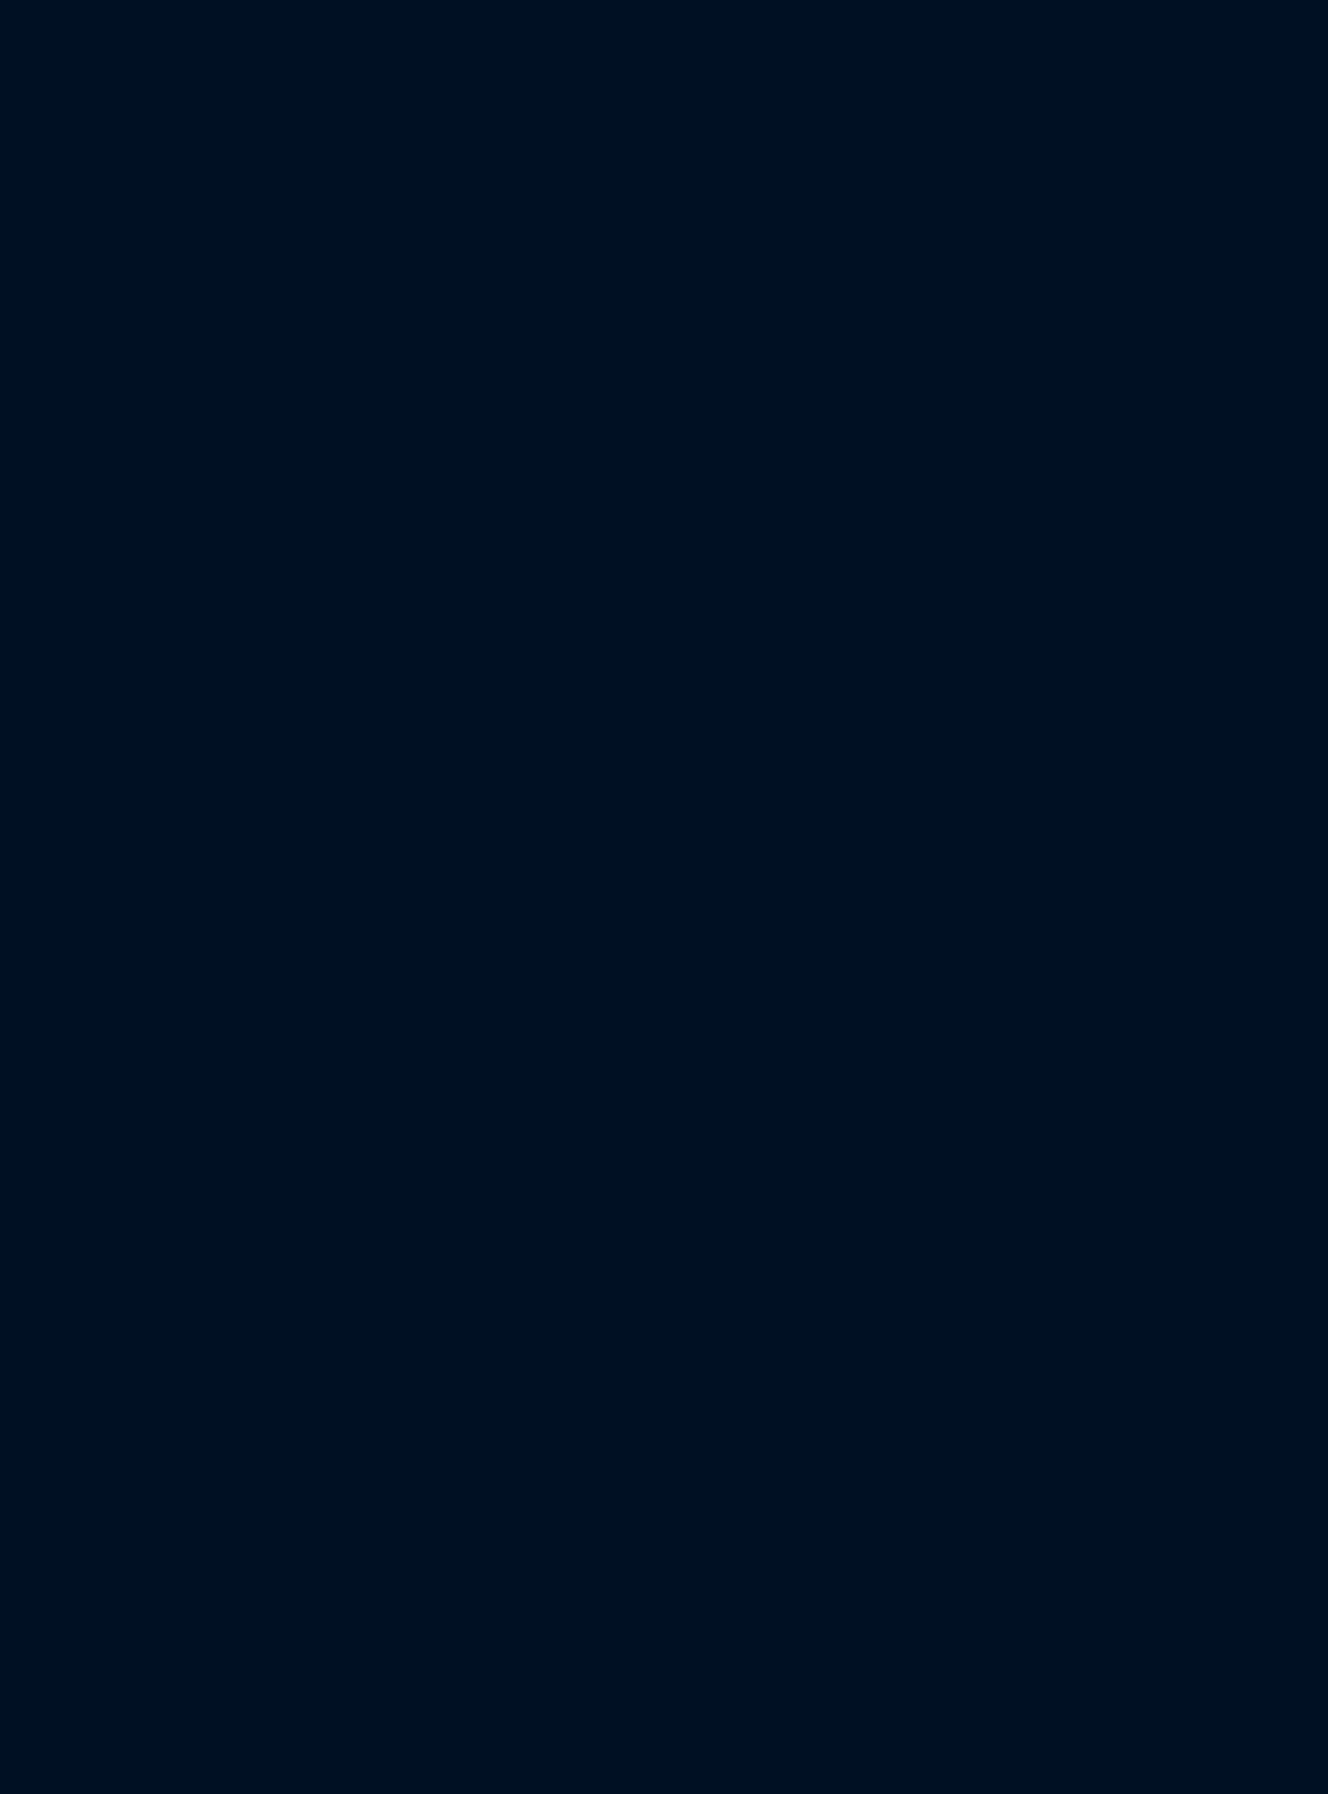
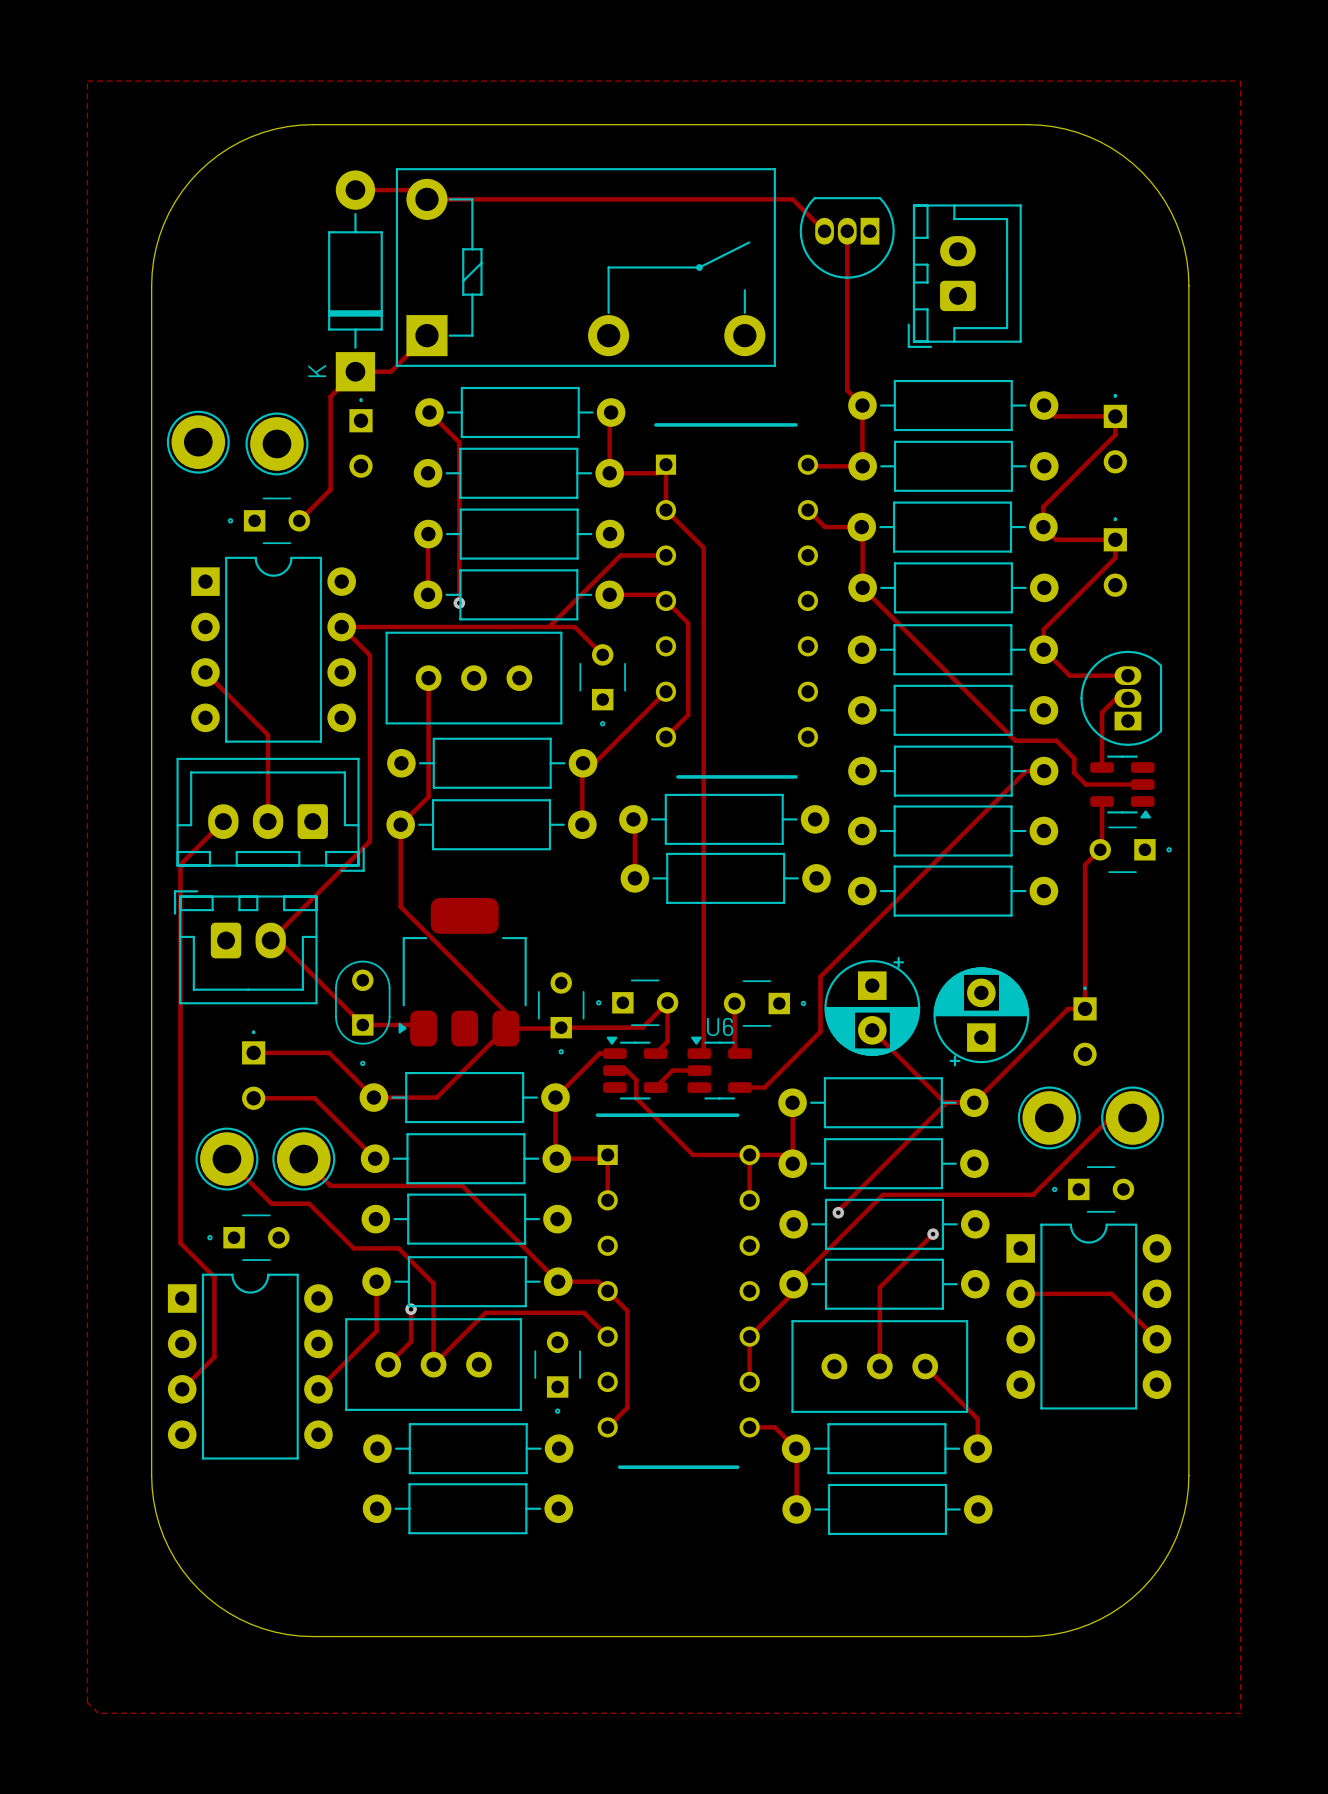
zone outline: none -> (87, 81) (87, 1702) (98, 1713) (1240, 1713) (1240, 81) (87, 81)
board edge: none -> (312, 124) (1040, 125) (1077, 132) (1100, 142) (1122, 155) (1150, 181) (1171, 212) (1184, 248) (1188, 285) (1188, 1488) (1181, 1525) (1171, 1548) (1158, 1570) (1132, 1597) (1100, 1619) (1065, 1632) (1027, 1636) (300, 1636) (262, 1628) (239, 1619) (218, 1605) (190, 1580) (169, 1548) (156, 1513) (151, 1475) (152, 273) (159, 235) (169, 212) (182, 191) (198, 171) (218, 155) (251, 136) (275, 129) (312, 124)
track: none -> (355, 190) (417, 190) (426, 199) (792, 199) (824, 231)
track: none -> (847, 231) (847, 390) (862, 405) (862, 466)
part: none -> (847, 237)
part: none -> (585, 267)
part: none -> (964, 276)
part: none -> (355, 280)
track: none -> (426, 335) (390, 371) (355, 371) (330, 396) (330, 489) (299, 520)
part: none -> (953, 405)
track: none -> (1044, 405) (1055, 416) (1115, 416) (1115, 434) (1043, 506) (1043, 527) (1056, 539) (1115, 539) (1115, 557) (1043, 629) (1043, 649) (1069, 675) (1127, 675)
track: none -> (429, 412) (459, 442) (459, 603)
part: none -> (520, 412)
track: none -> (611, 412) (609, 473) (657, 473) (665, 464) (665, 510) (703, 547) (703, 1049) (699, 1053)
part: none -> (1115, 433)
part: none -> (361, 438)
part: none -> (198, 442)
part: none -> (276, 443)
track: none -> (807, 464) (809, 466) (862, 466)
part: none -> (953, 466)
part: none -> (518, 473)
track: none -> (807, 510) (824, 527) (862, 527) (862, 587) (1015, 740) (1056, 740) (1074, 758) (1074, 772) (1085, 784) (1142, 784)
part: none -> (268, 520)
part: none -> (952, 527)
track: none -> (428, 534) (428, 594)
part: none -> (519, 534)
track: none -> (665, 555) (620, 555) (549, 627)
part: none -> (1115, 557)
part: none -> (953, 587)
part: none -> (518, 594)
track: none -> (609, 594) (659, 594) (688, 623) (688, 714) (665, 737)
part: none -> (736, 600)
via: none -> (459, 603)
part: none -> (273, 649)
part: none -> (952, 649)
track: none -> (602, 654) (574, 627) (341, 627) (369, 655) (369, 841) (270, 940) (278, 940) (362, 1024) (419, 1024) (423, 1028)
track: none -> (205, 672) (268, 735) (268, 821)
track: none -> (428, 678) (428, 796) (400, 824) (400, 906) (505, 1012) (505, 1028)
part: none -> (473, 678)
part: none -> (602, 685)
track: none -> (665, 691) (594, 763) (582, 763) (582, 824)
part: none -> (1121, 698)
track: none -> (1127, 698) (1116, 698) (1102, 712) (1102, 767)
part: none -> (953, 710)
part: none -> (492, 763)
part: none -> (953, 771)
track: none -> (1044, 771) (1026, 771) (820, 976) (820, 1031) (764, 1087) (740, 1087)
part: none -> (1122, 787)
track: none -> (1102, 801) (1102, 847) (1085, 864) (1085, 1008) (1068, 1008) (974, 1102) (944, 1102) (872, 1030)
part: none -> (270, 814)
track: none -> (633, 819) (634, 878)
part: none -> (724, 819)
track: none -> (223, 821) (180, 864) (180, 1243) (214, 1277) (214, 1357) (182, 1389)
part: none -> (491, 824)
part: none -> (953, 831)
part: none -> (1130, 849)
part: none -> (725, 878)
part: none -> (953, 891)
part: none -> (245, 947)
part: none -> (462, 972)
part: none -> (637, 1002)
track: none -> (734, 1003) (734, 1048) (740, 1053)
part: none -> (764, 1003)
part: none -> (872, 1006)
part: none -> (362, 1013)
part: none -> (561, 1013)
part: none -> (981, 1016)
part: none -> (1085, 1026)
track: none -> (505, 1028) (642, 1027) (667, 1002) (667, 1041) (655, 1053)
track: none -> (505, 1028) (436, 1097) (373, 1097) (329, 1052) (253, 1052)
track: none -> (614, 1053) (599, 1053) (555, 1097) (555, 1157) (603, 1158) (607, 1154) (607, 1200)
part: none -> (635, 1068)
U6: none -> (719, 1068)
part: none -> (253, 1070)
track: none -> (614, 1070) (626, 1070) (636, 1080) (636, 1098) (692, 1154) (783, 1154) (792, 1163) (792, 1102)
track: none -> (699, 1070) (672, 1070) (655, 1087)
part: none -> (464, 1097)
track: none -> (253, 1098) (314, 1098) (375, 1158)
part: none -> (883, 1102)
track: none -> (946, 1102) (838, 1212)
part: none -> (1049, 1117)
track: none -> (1132, 1117) (1110, 1117) (1033, 1194) (883, 1194) (793, 1284) (793, 1292) (749, 1336) (749, 1381)
part: none -> (1132, 1117)
track: none -> (749, 1154) (749, 1200)
part: none -> (465, 1158)
track: none -> (226, 1159) (271, 1203) (309, 1203) (353, 1248) (398, 1248) (433, 1283) (433, 1364) (485, 1312) (583, 1312) (607, 1336)
part: none -> (226, 1159)
track: none -> (303, 1159) (330, 1185) (462, 1185) (558, 1281) (598, 1281) (627, 1310) (627, 1407) (607, 1427)
part: none -> (303, 1159)
part: none -> (883, 1163)
part: none -> (1093, 1189)
via: none -> (838, 1212)
part: none -> (466, 1219)
part: none -> (884, 1224)
track: none -> (933, 1234) (879, 1287) (879, 1366)
via: none -> (933, 1234)
part: none -> (248, 1237)
track: none -> (376, 1281) (376, 1331) (318, 1389)
part: none -> (467, 1281)
part: none -> (884, 1284)
part: none -> (677, 1291)
track: none -> (1020, 1293) (1111, 1293) (1156, 1339)
track: none -> (411, 1309) (411, 1341) (388, 1364)
via: none -> (411, 1309)
part: none -> (1088, 1316)
part: none -> (433, 1364)
part: none -> (250, 1366)
part: none -> (879, 1366)
track: none -> (925, 1366) (977, 1418) (977, 1448)
part: none -> (557, 1372)
track: none -> (749, 1427) (774, 1427) (796, 1449) (796, 1509)
part: none -> (468, 1448)
part: none -> (886, 1448)
part: none -> (467, 1508)
part: none -> (887, 1509)

